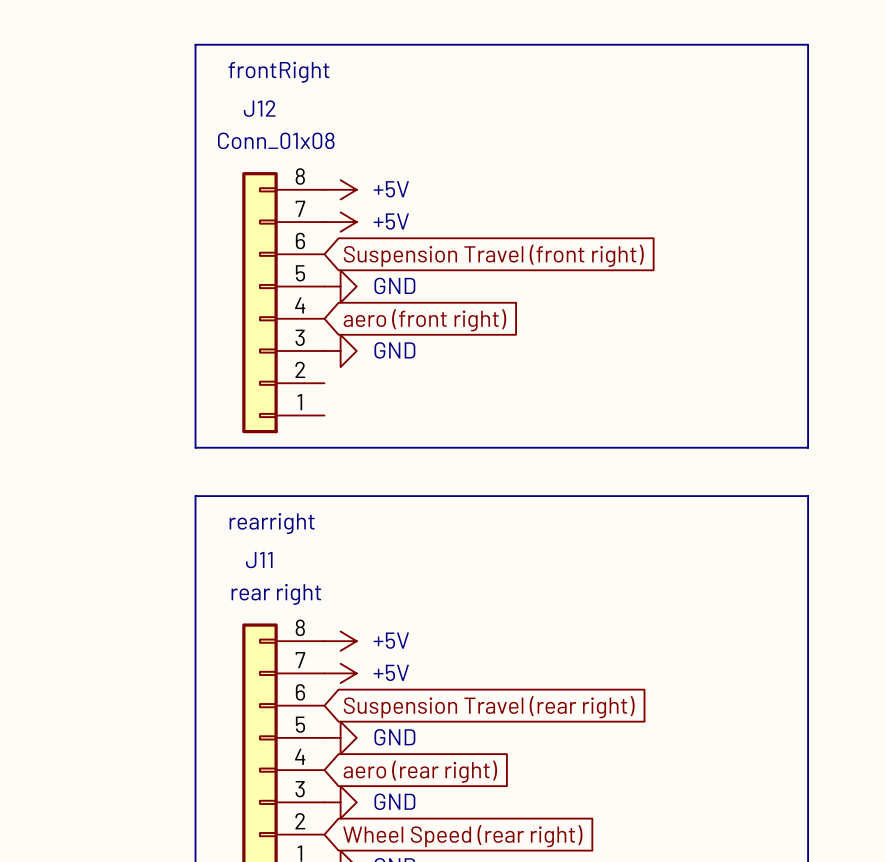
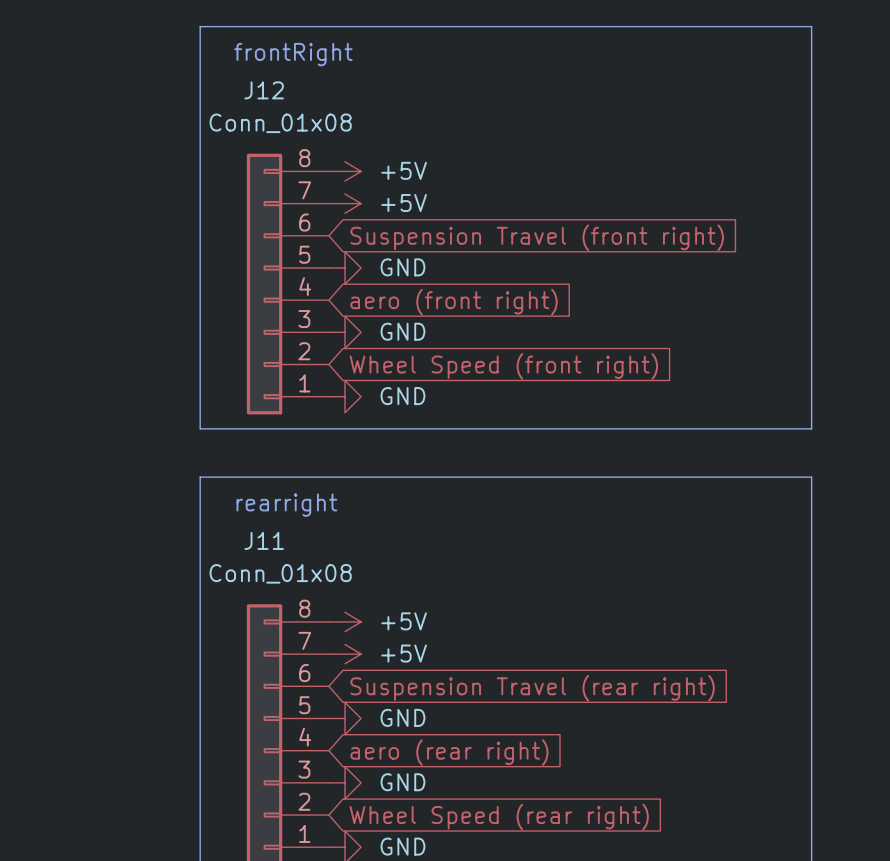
global label: none -> Wheel Speed (front right) (503, 366)
power symbol: none -> GND (345, 396)
J11 value: rear right (276, 594) -> Conn_01x08 (280, 573)

